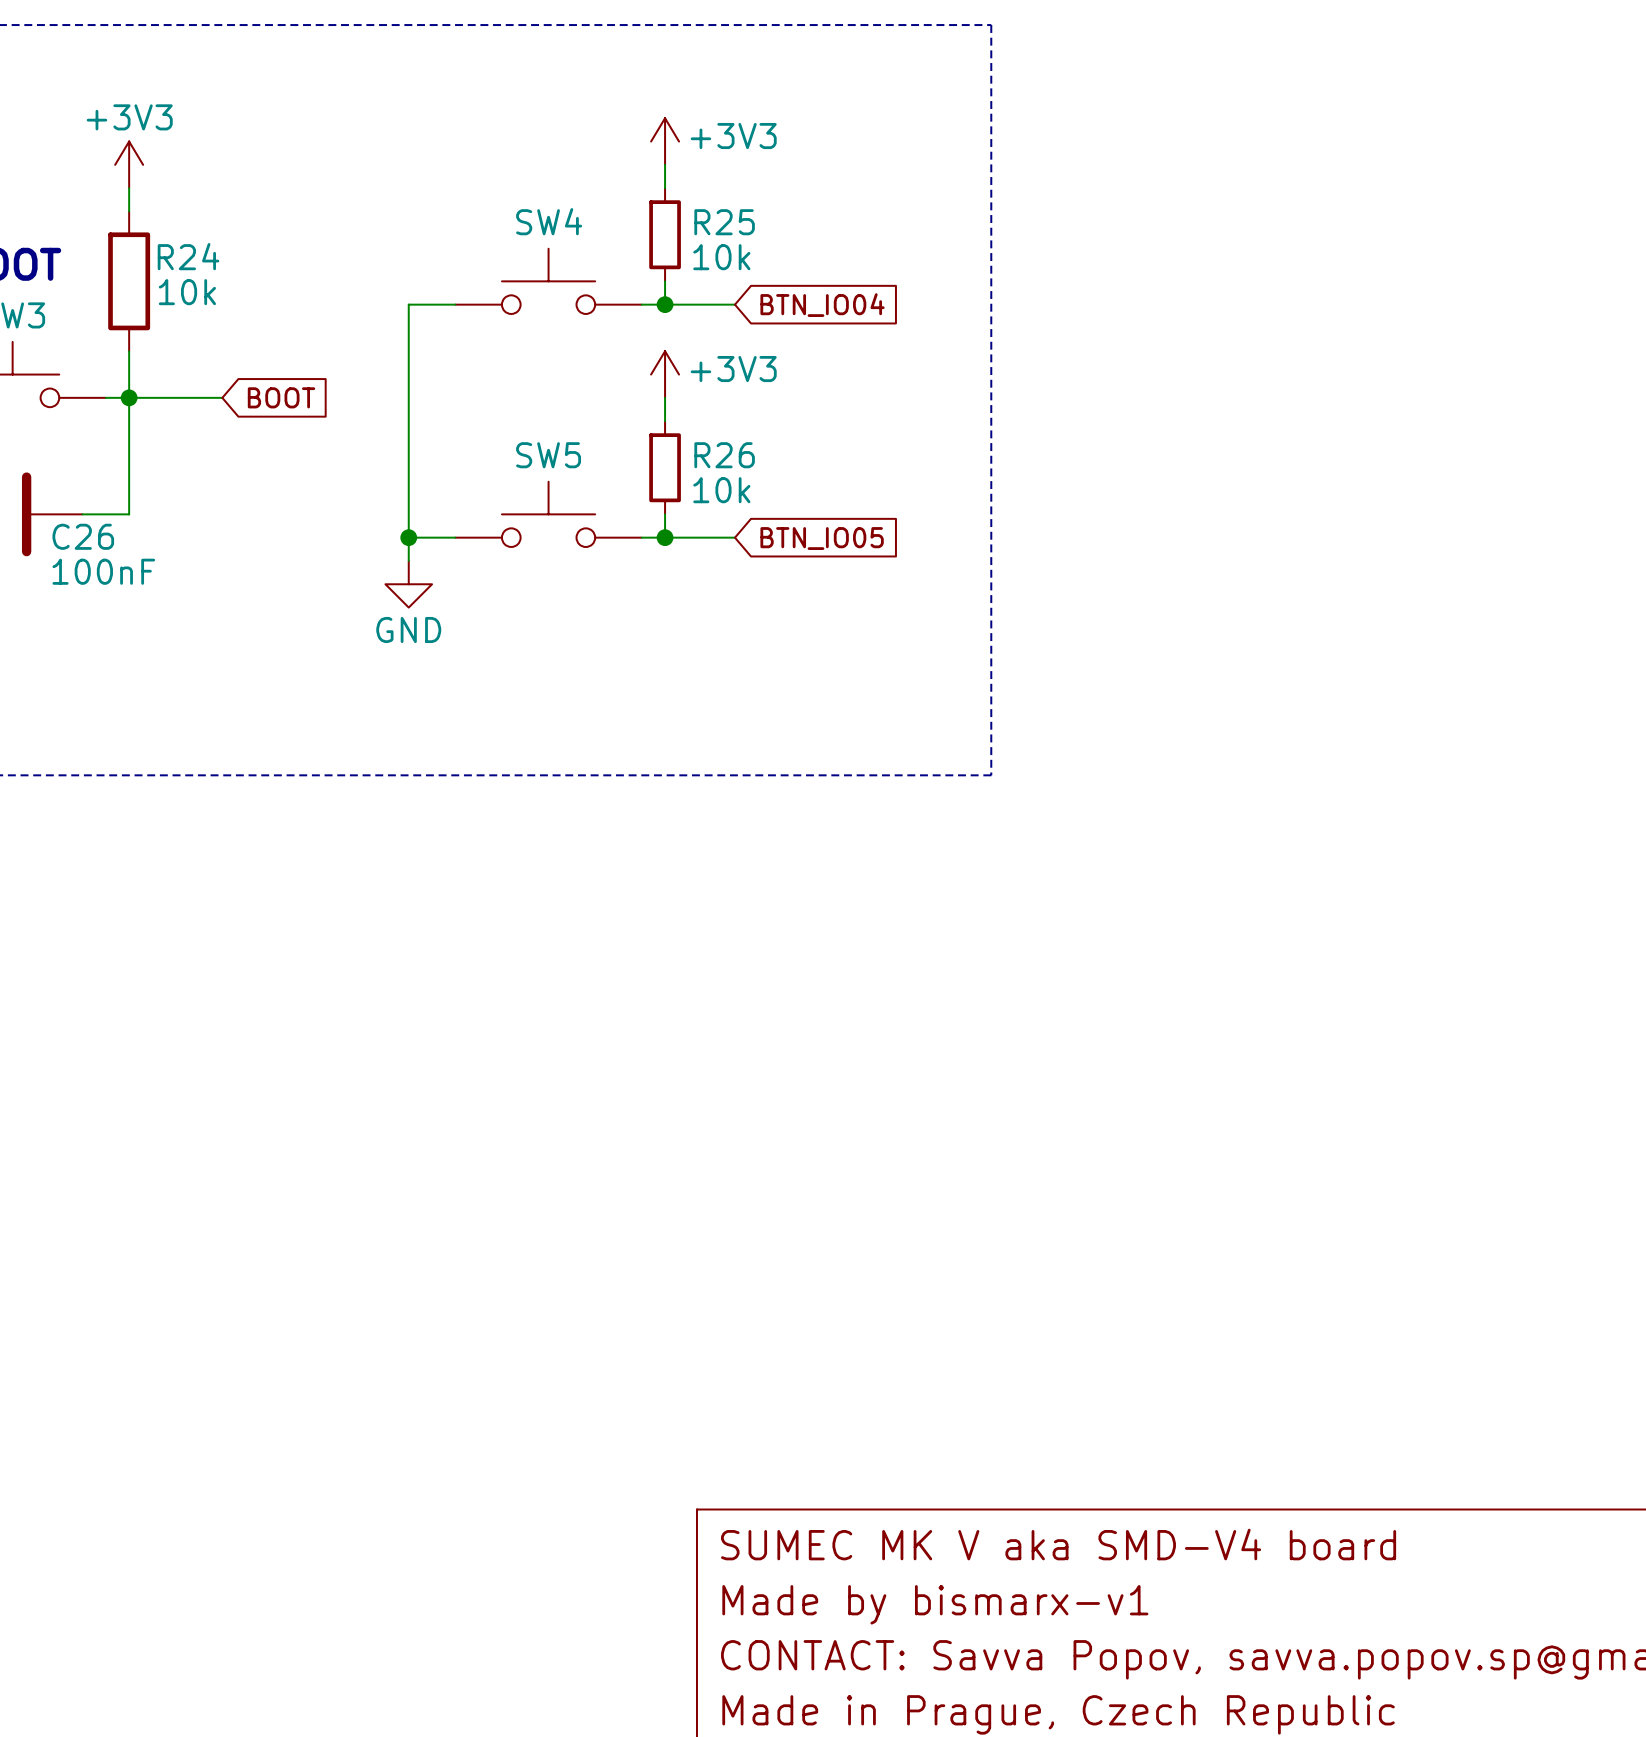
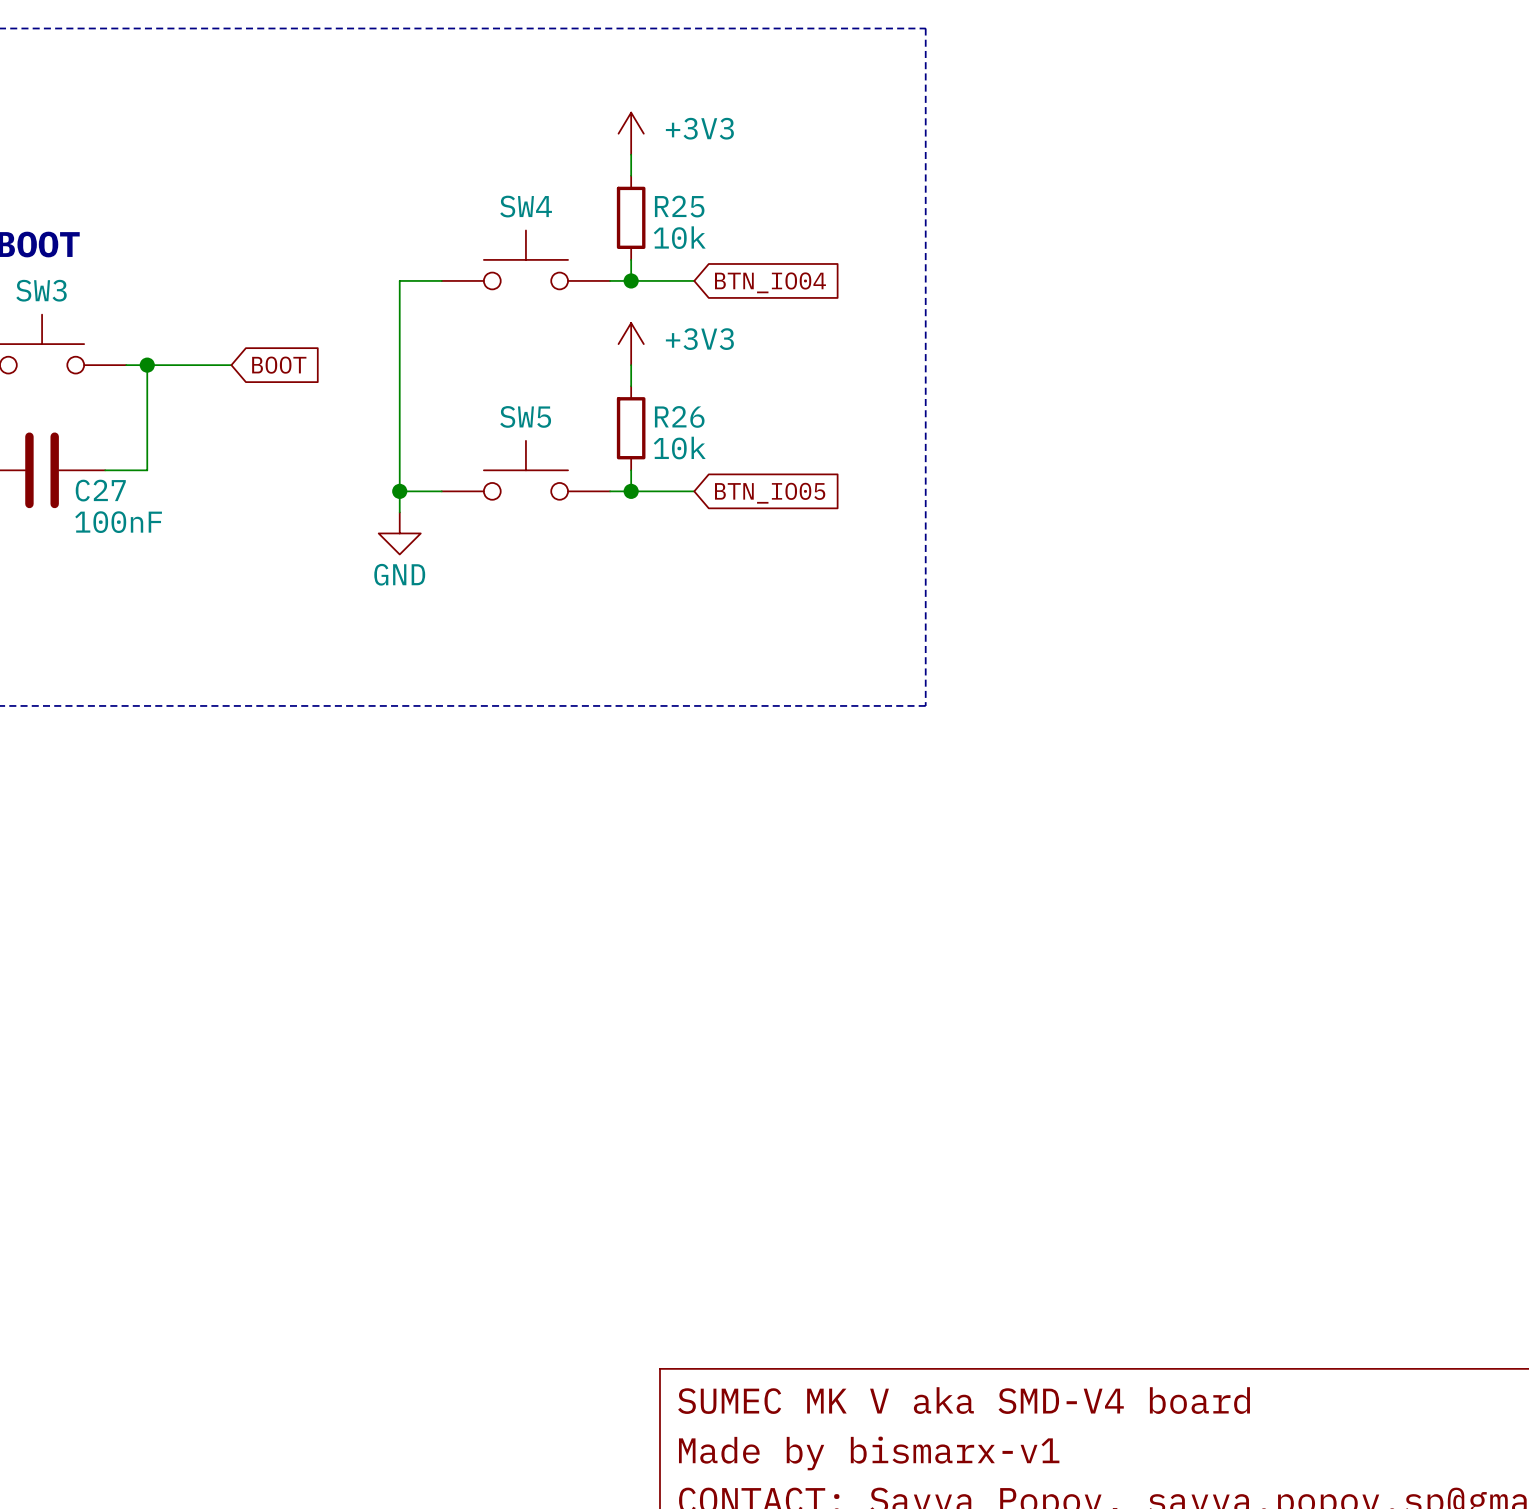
power symbol: +3V3 (129, 164) -> none
wire: (129, 188) (129, 211) -> none
R24: 10k (129, 281) -> none
wire: (129, 351) (129, 397) -> none
C26 name: C26 (83, 536) -> C27 (100, 490)

